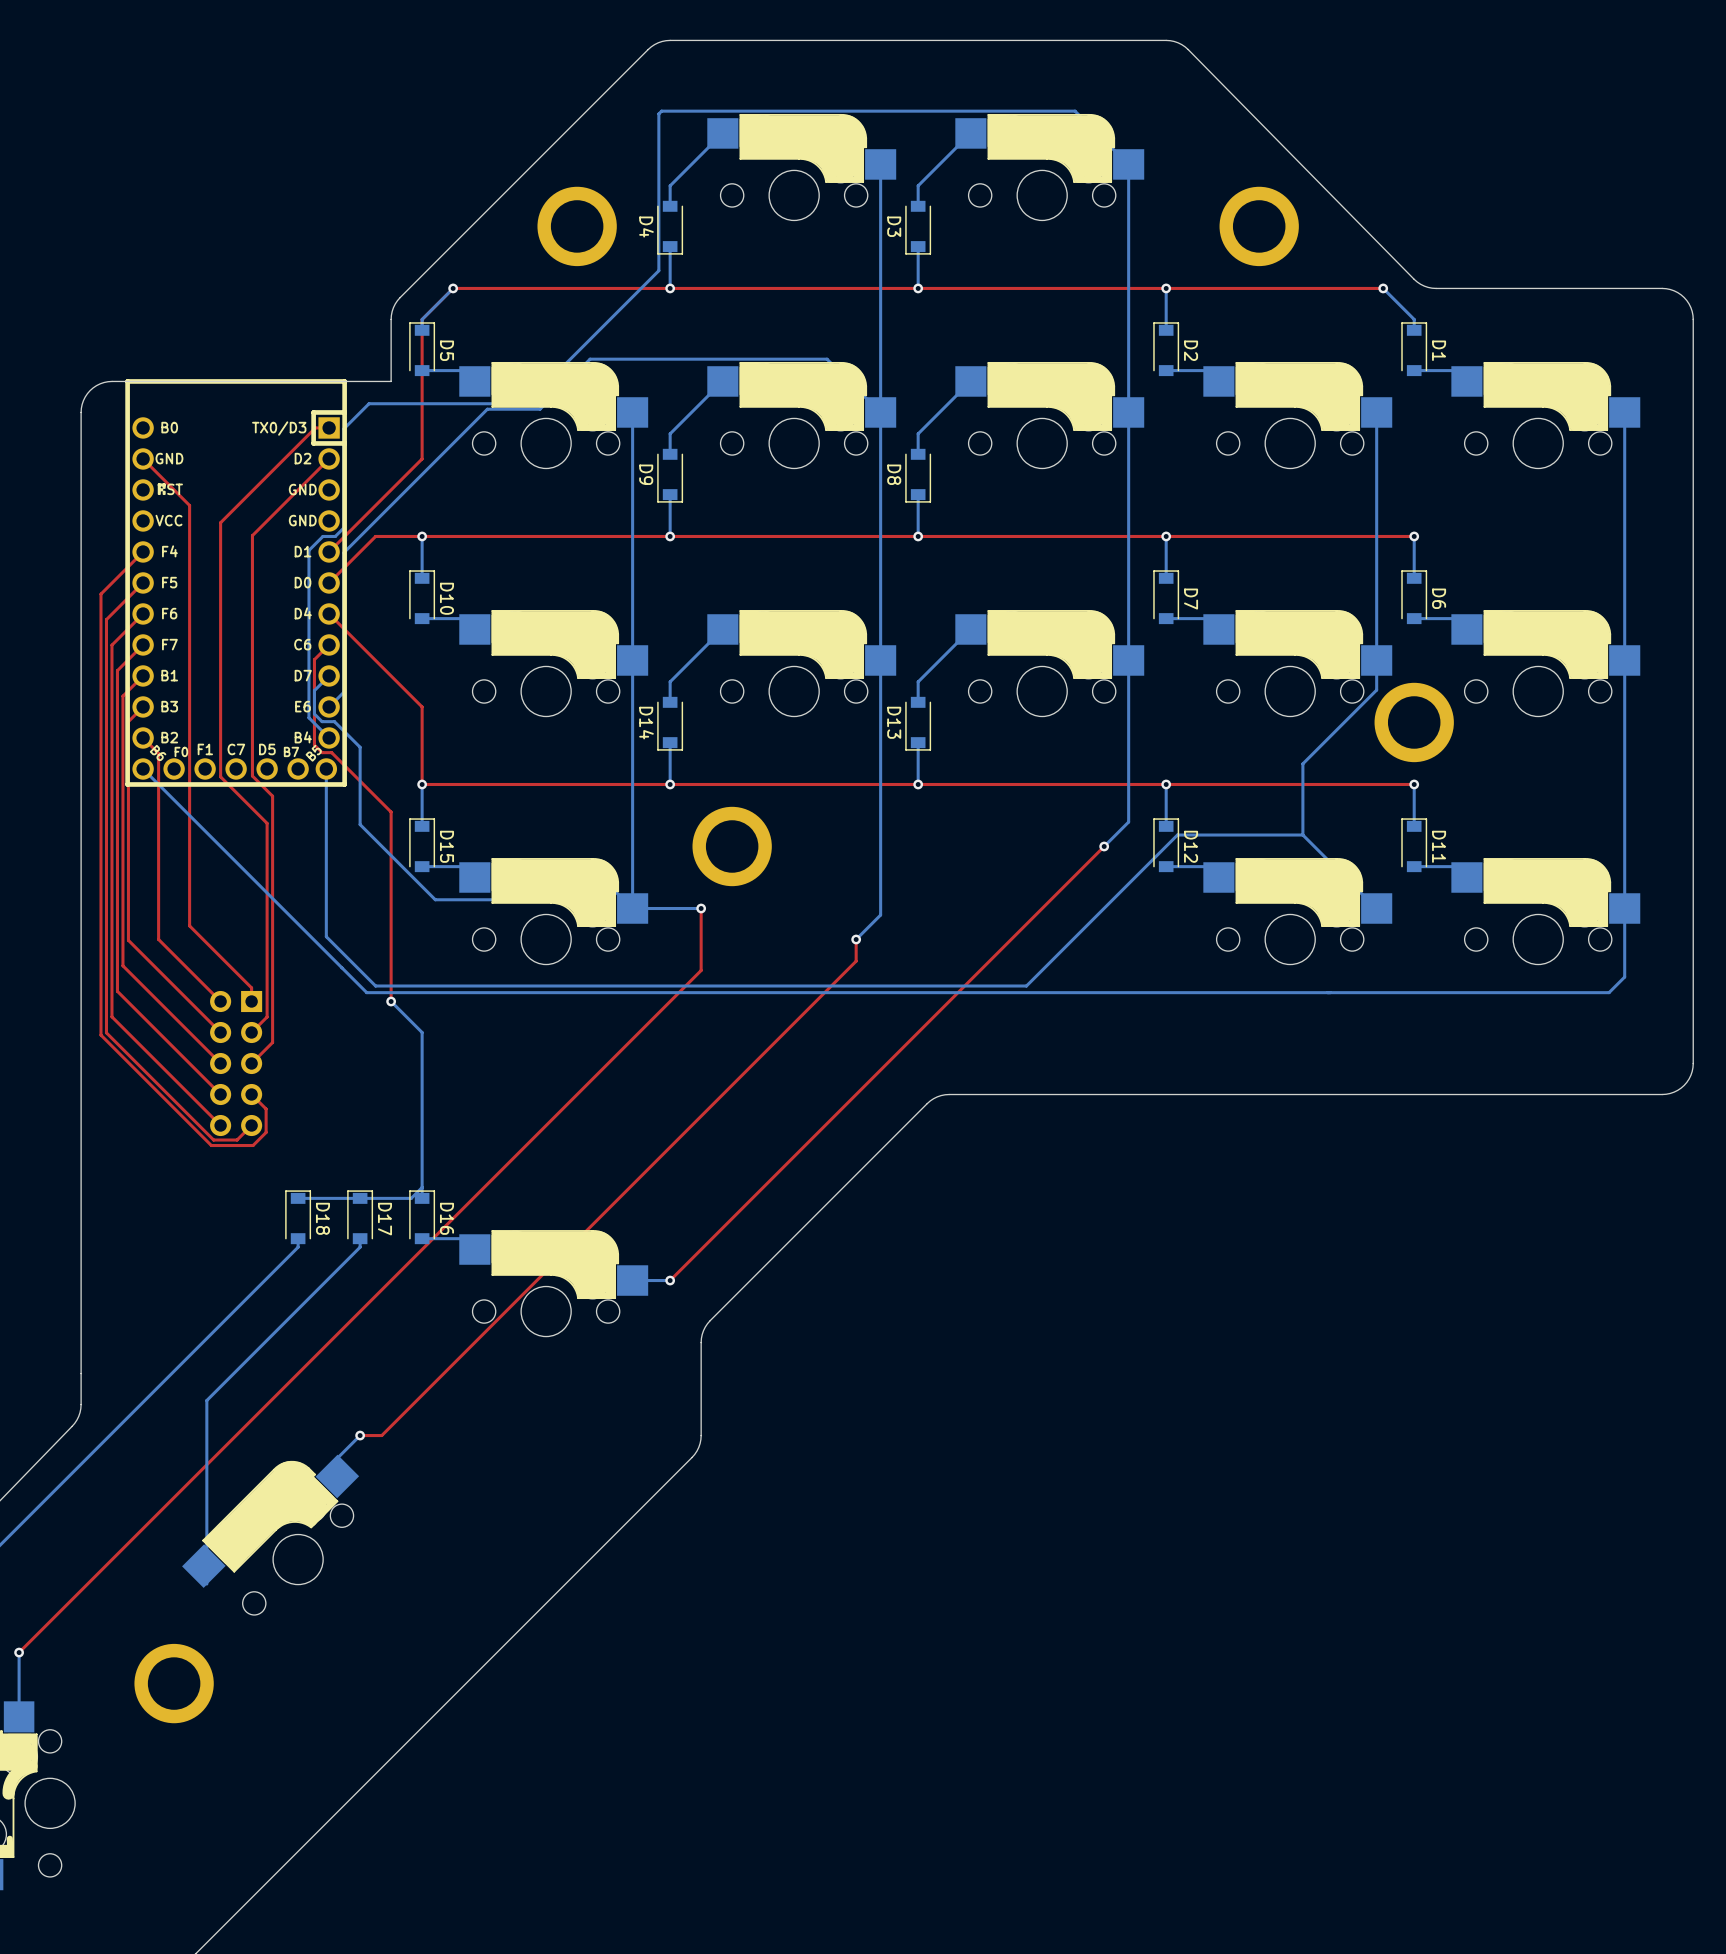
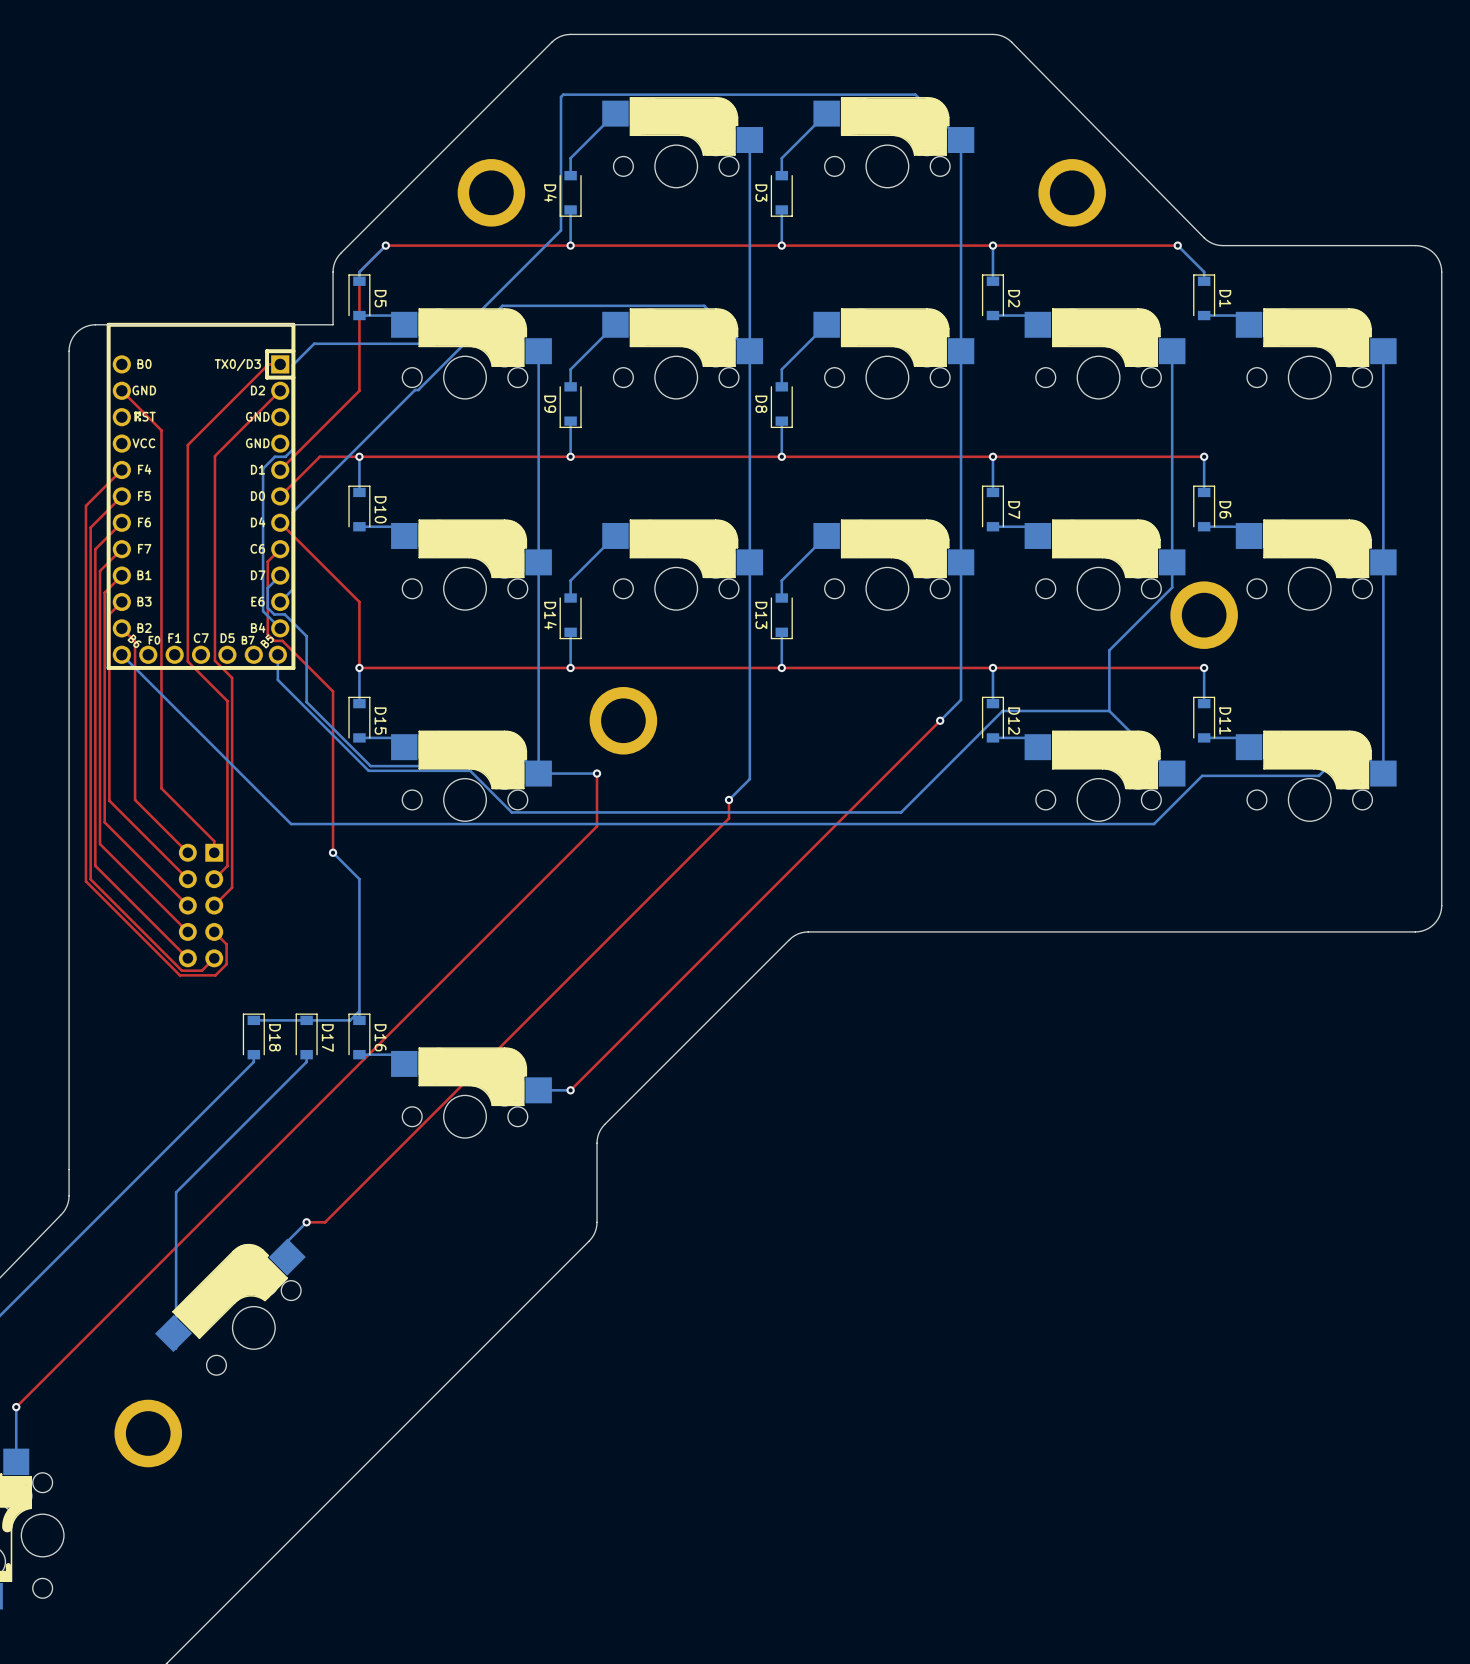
bottom track: (540, 409) (487, 409) (343, 552) (343, 601) -> (459, 348) (418, 390) (415, 390) (292, 512)
bottom track: (326, 798) (326, 936) (375, 986) (1026, 986) (1058, 954) -> (277, 679) (368, 770) (470, 770) (511, 812) (901, 812)
bottom track: (1624, 908) (1624, 977) (1609, 992) (366, 992) (341, 967) -> (1383, 773) (1364, 754) (1340, 754) (1318, 775) (1202, 775) (1154, 824) (291, 824)

